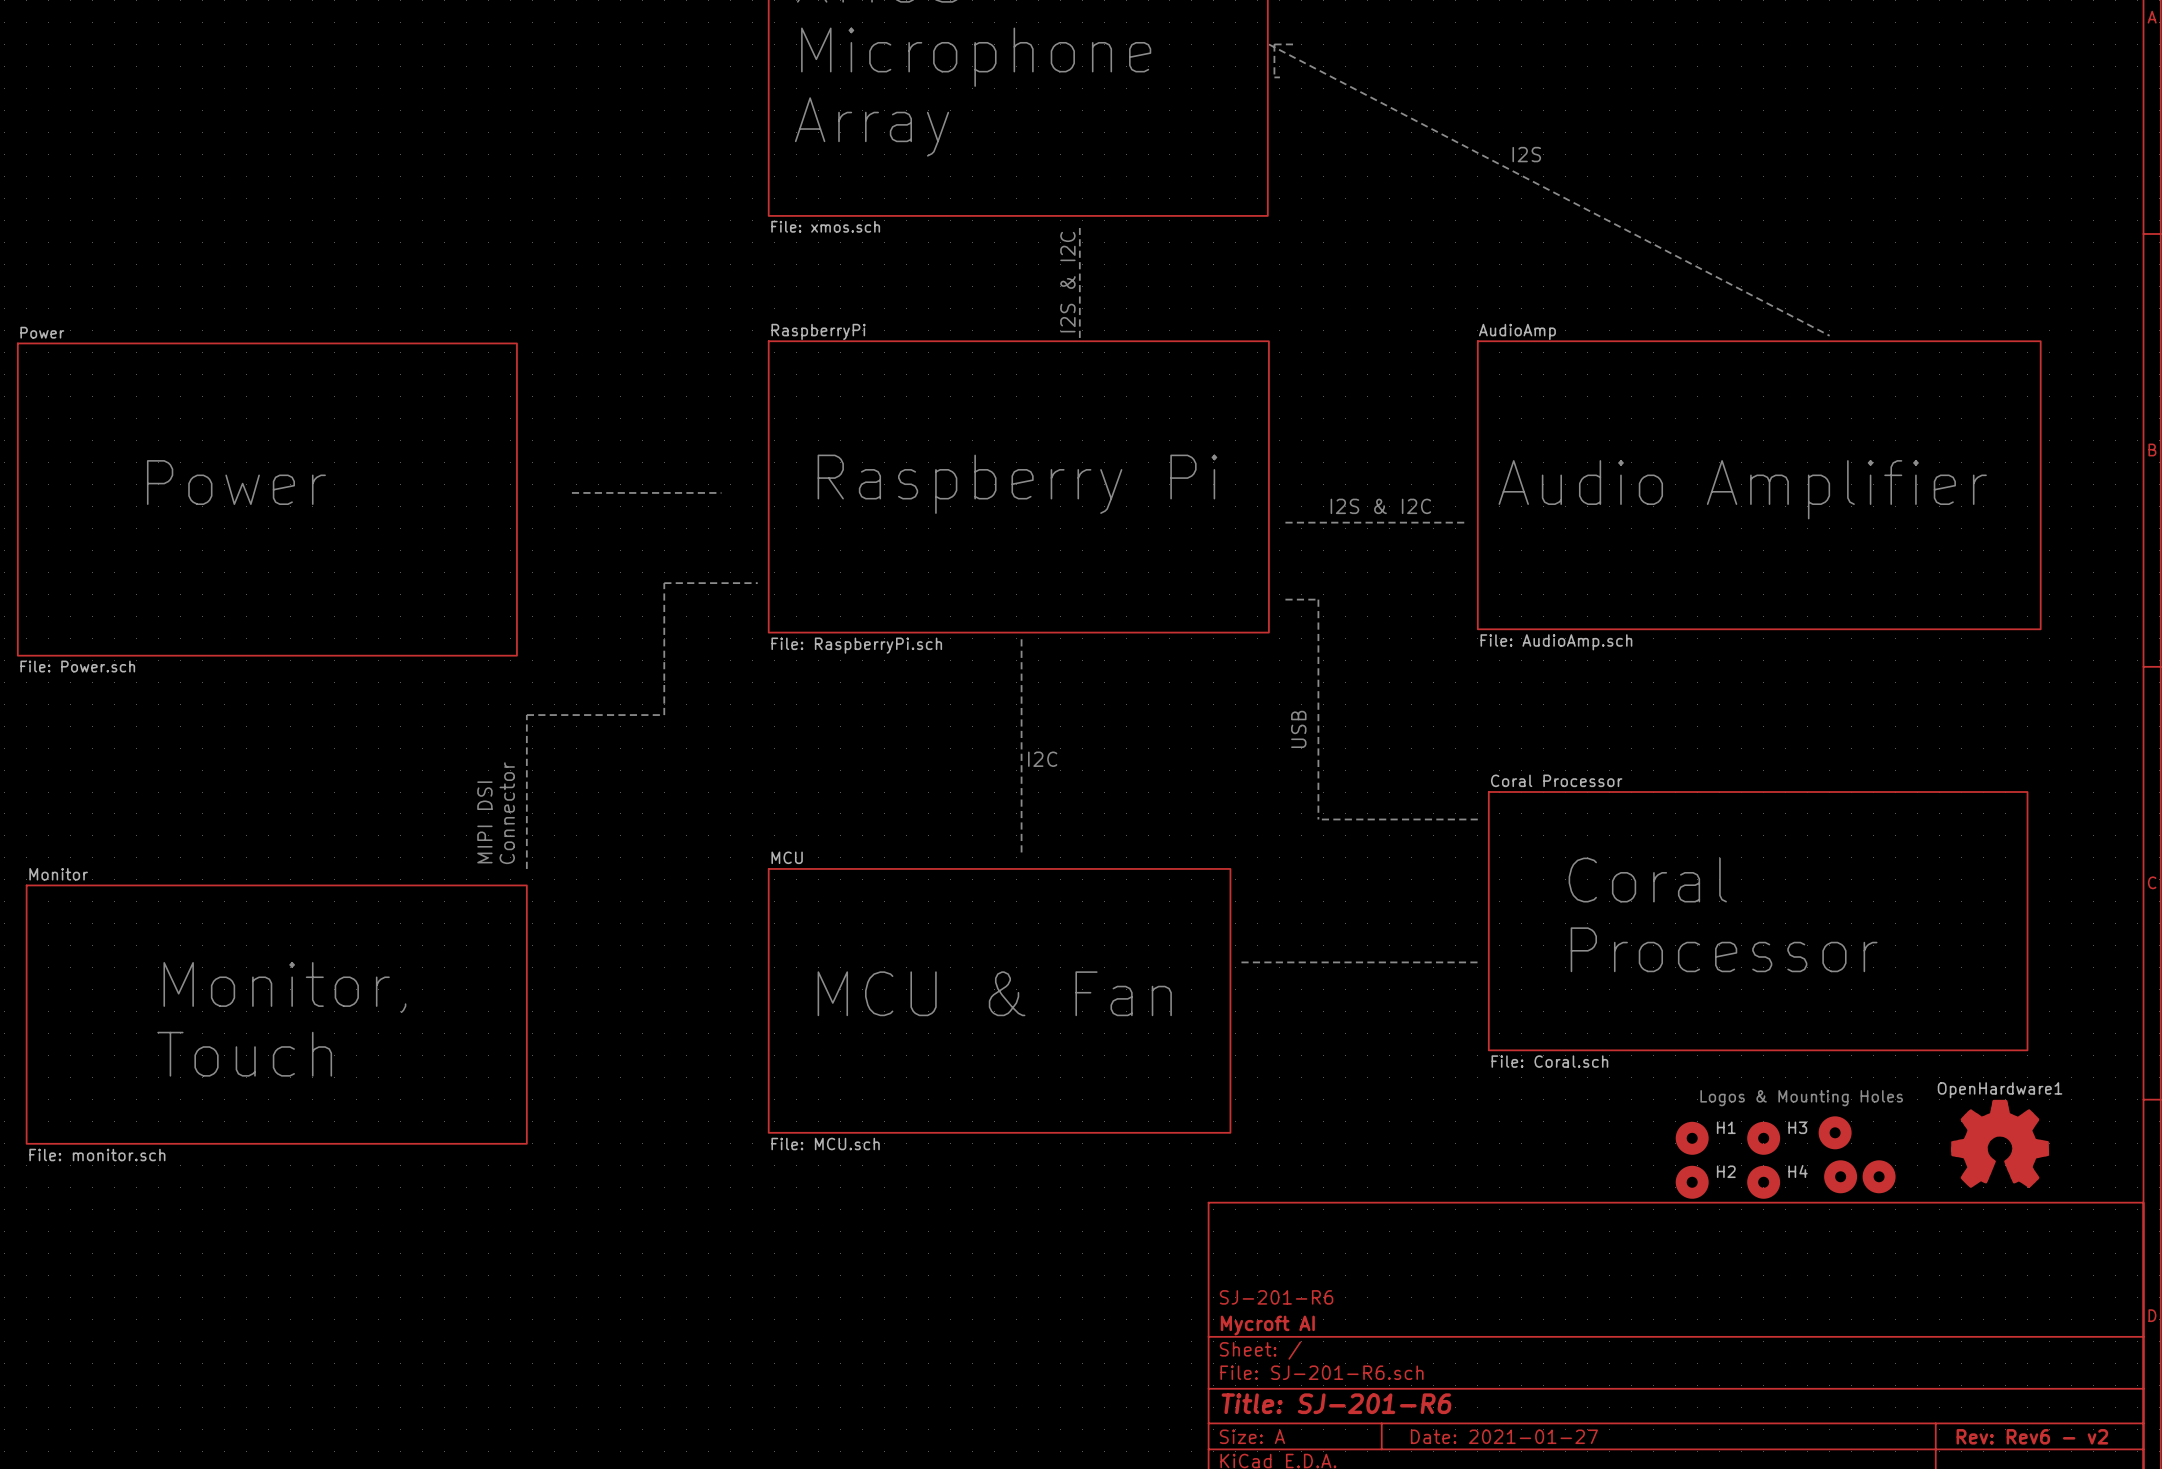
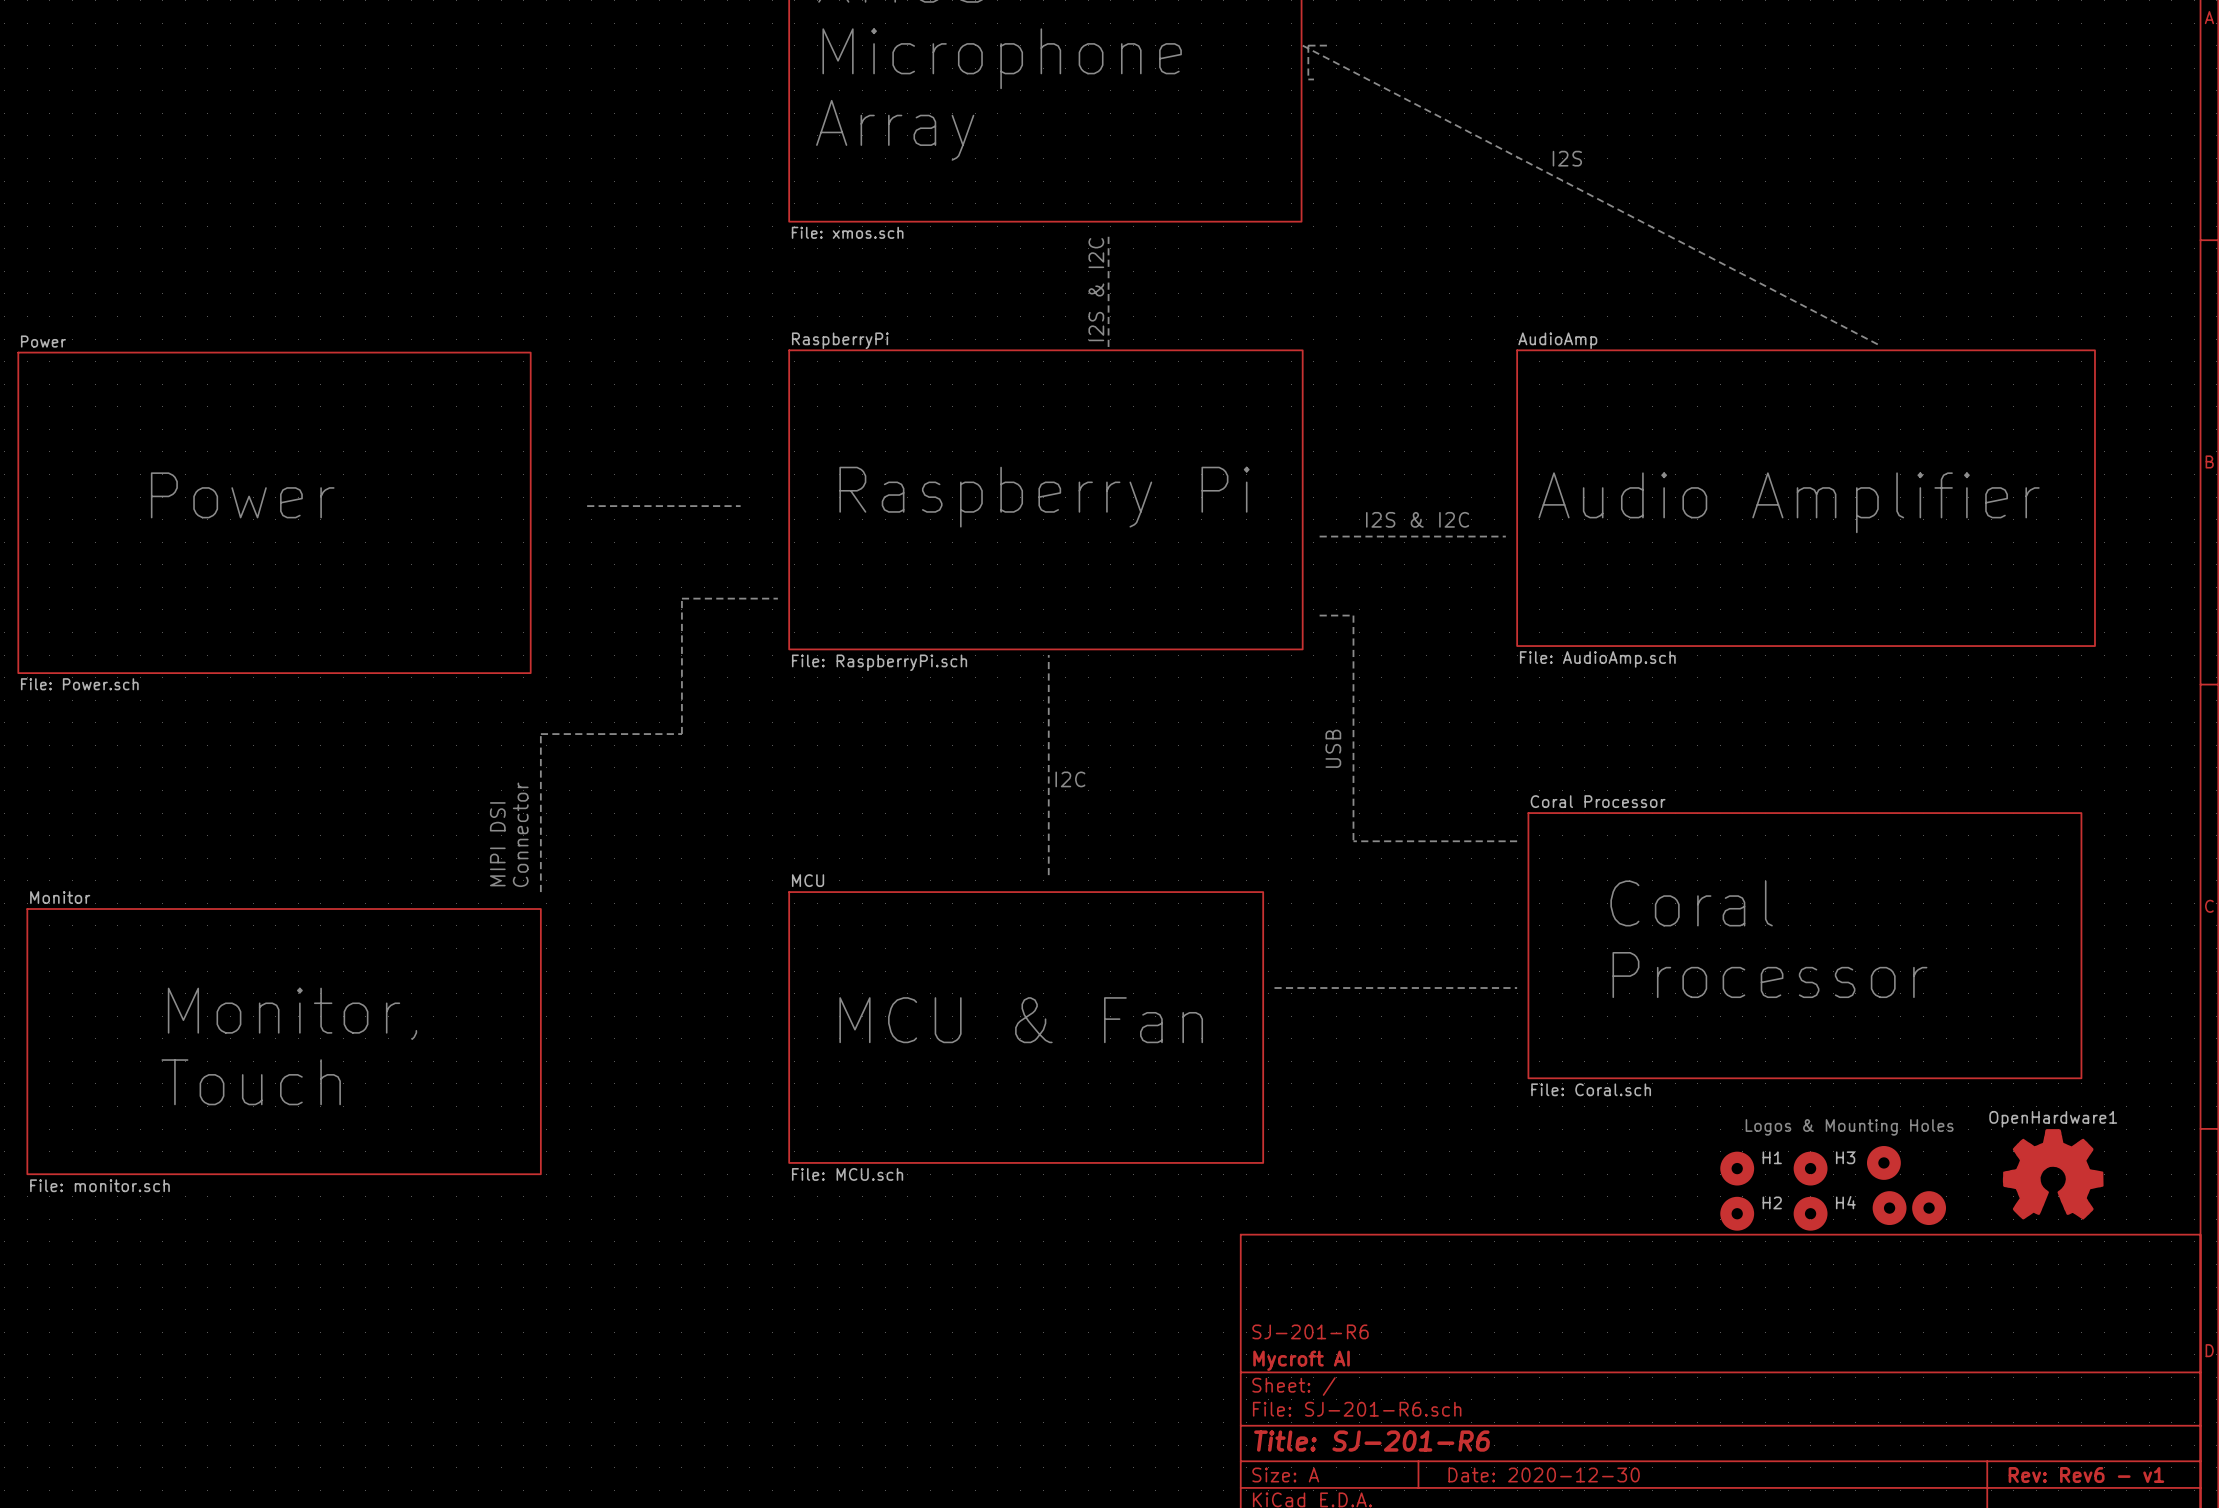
title block: Date: 2021-01-27 (1504, 1436) -> Date: 2020-12-30 (1544, 1475)
title block: Rev: Rev6 - v2 (2032, 1436) -> Rev: Rev6 - v1 (2086, 1475)

